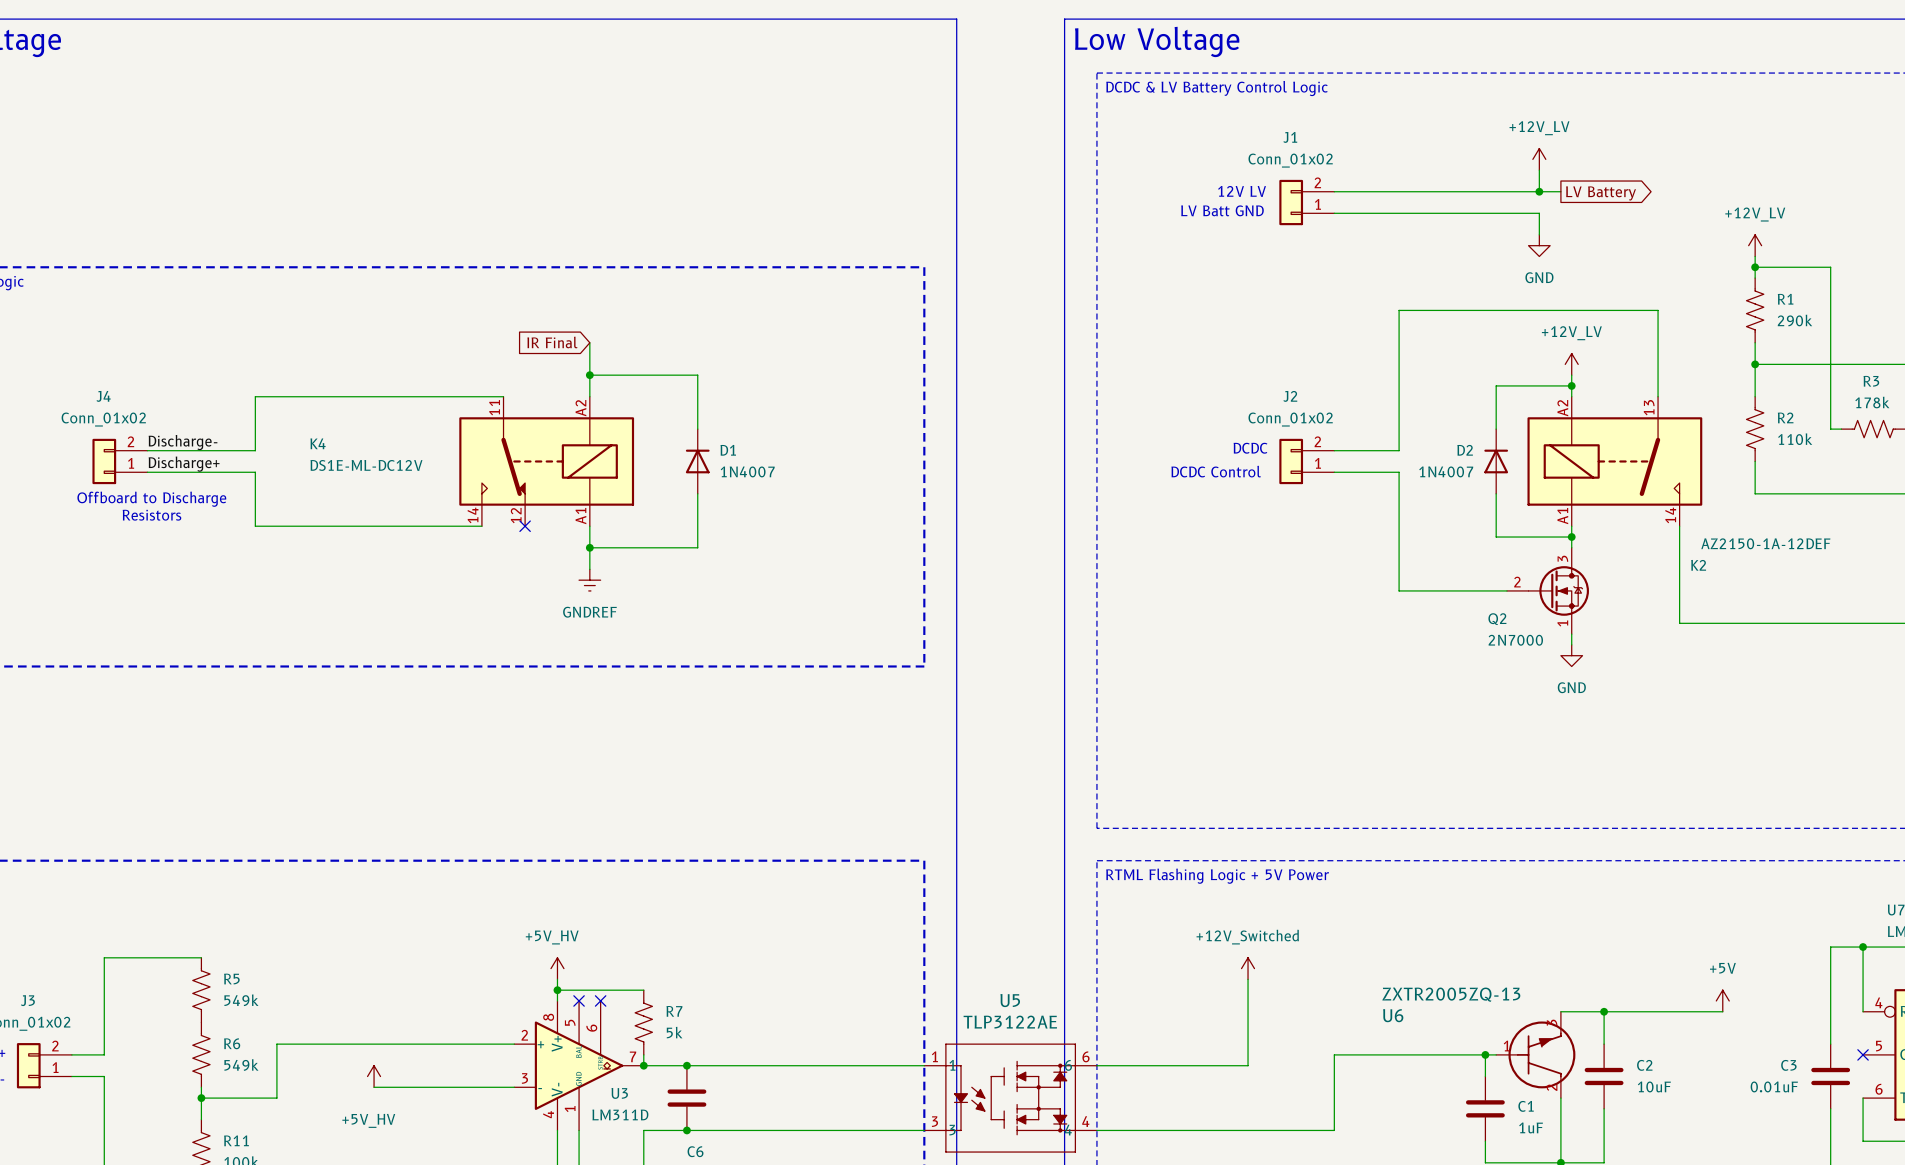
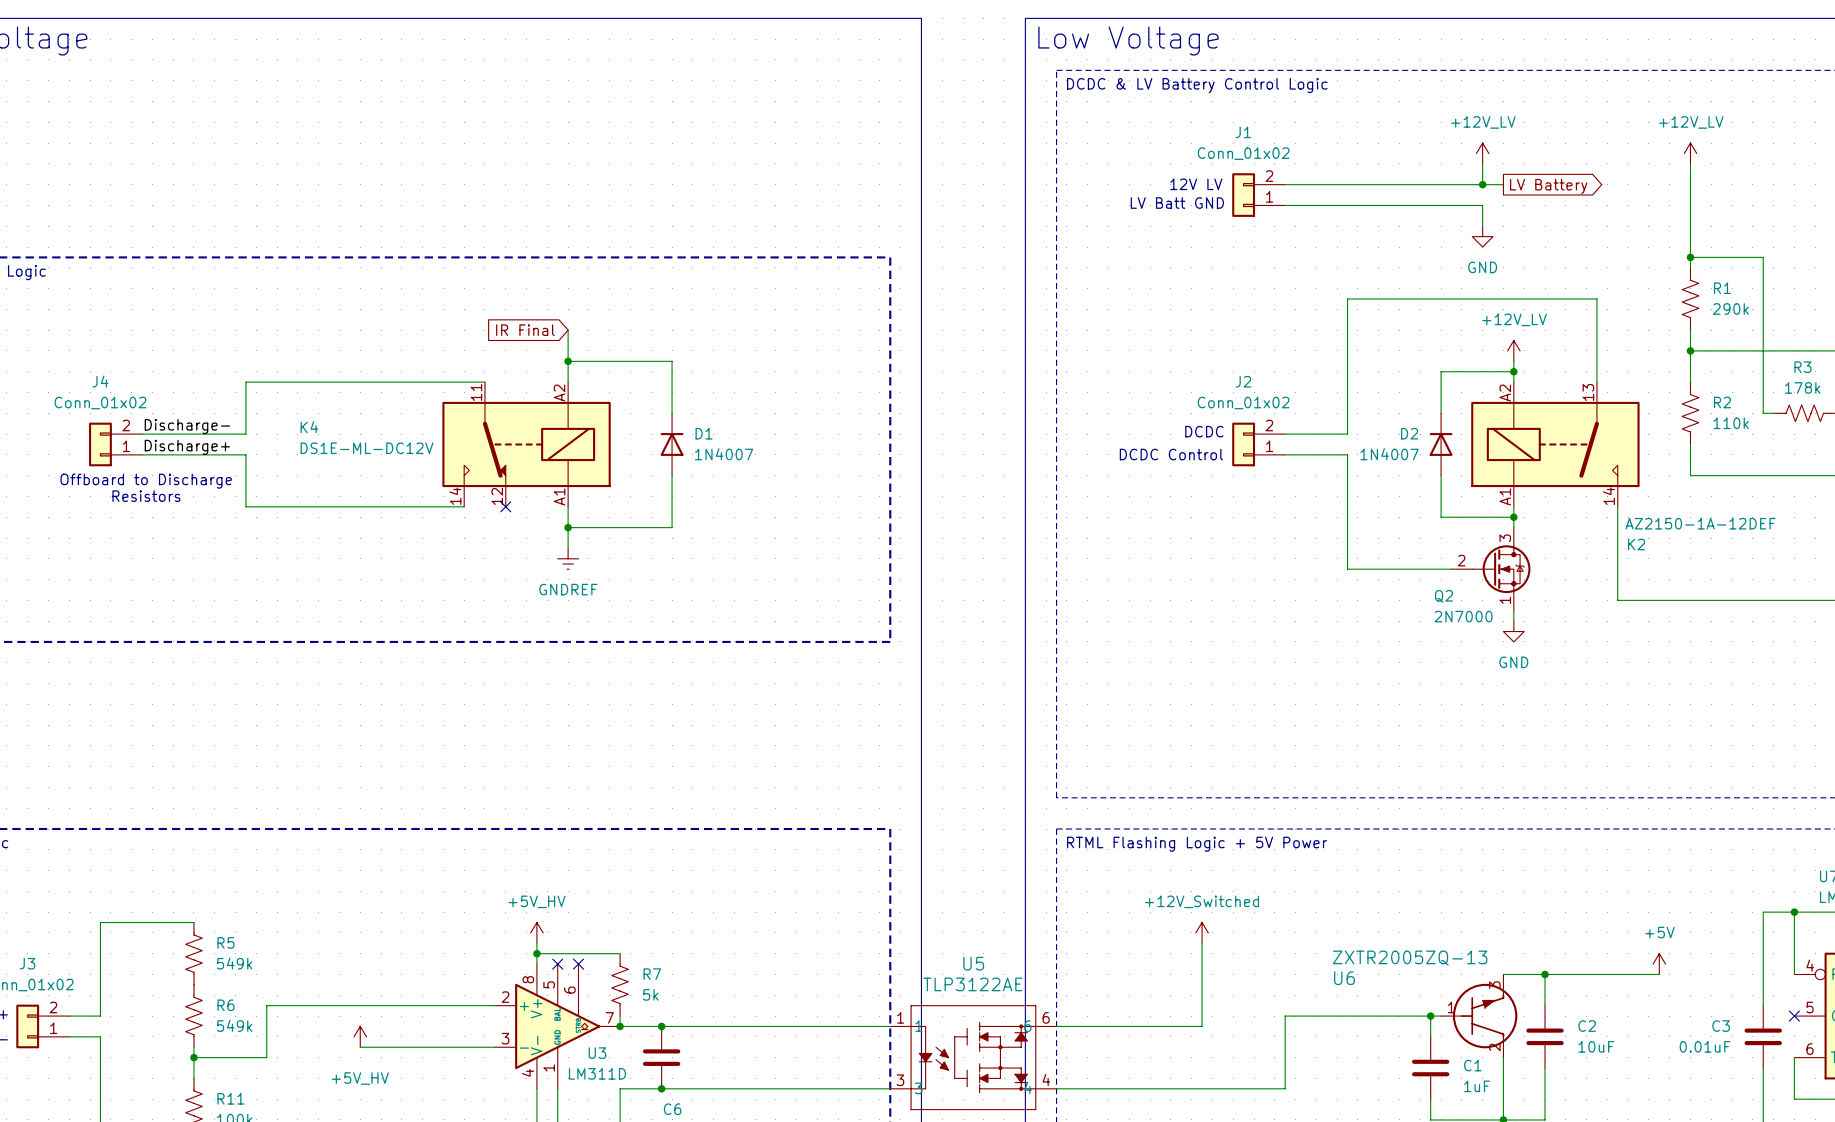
wire: none -> (1690, 163) (1690, 247)
power symbol position: +12V_LV (1755, 245) -> +12V_LV (1690, 153)

